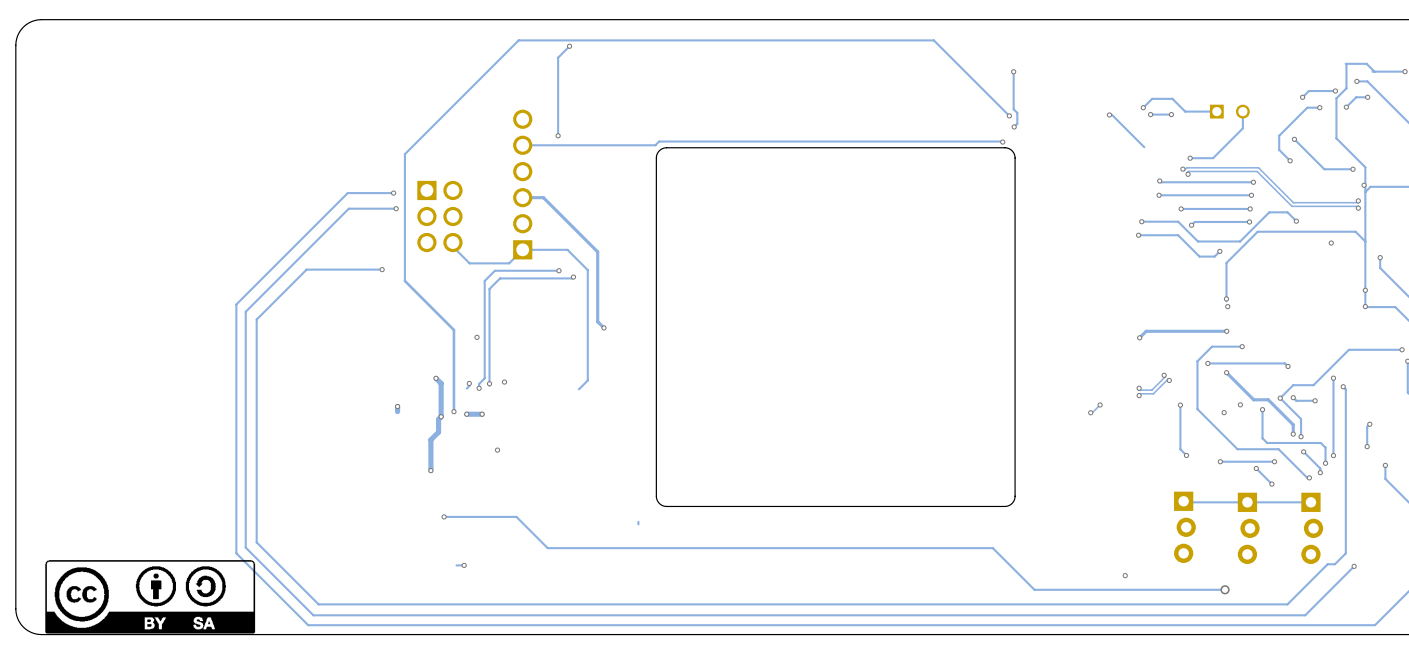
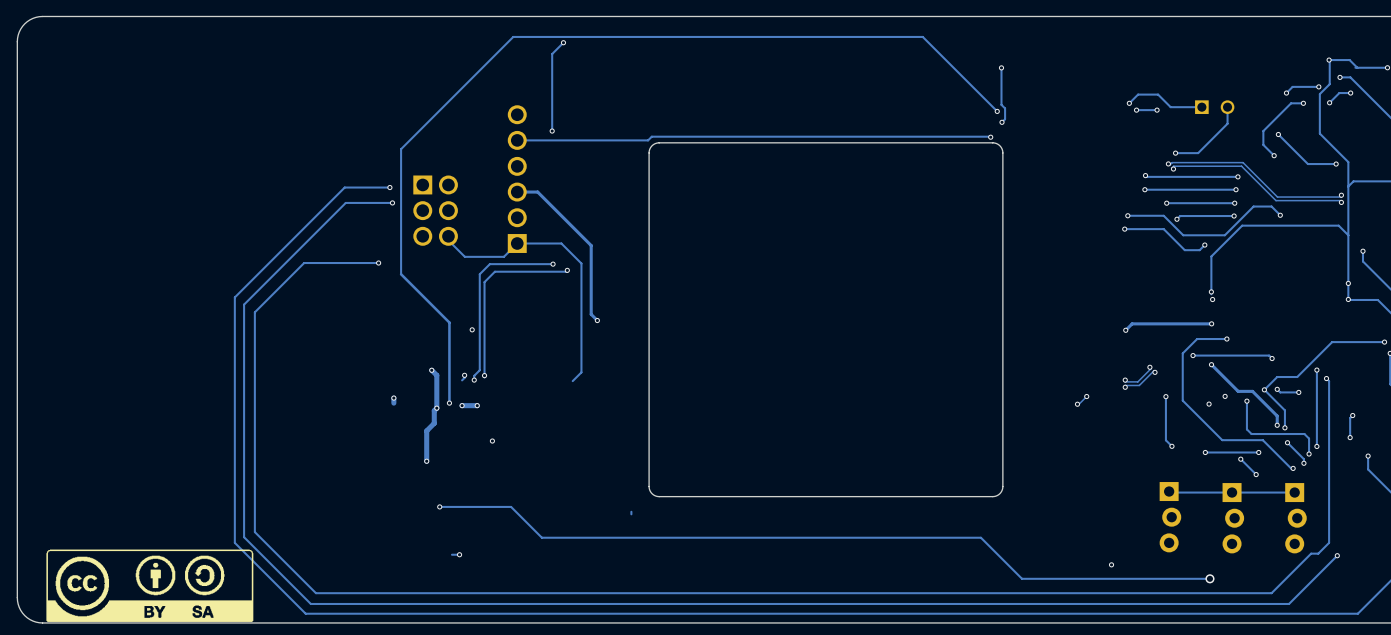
via: none -> (1329, 60)
track: (1109, 114) (1112, 114) (1144, 147) -> none
via: (1109, 114) -> none
via: (1364, 185) -> none
via: (1331, 243) -> none
via: (504, 382) -> none

